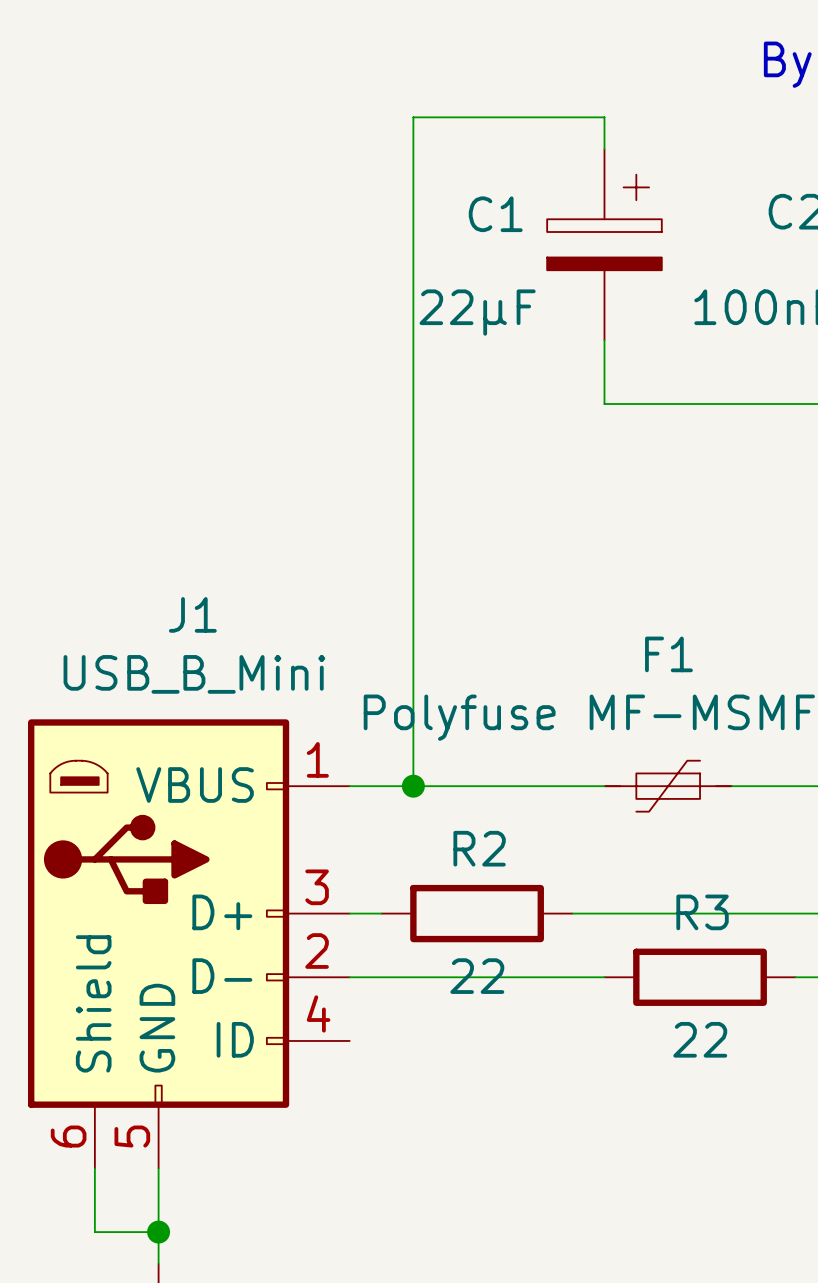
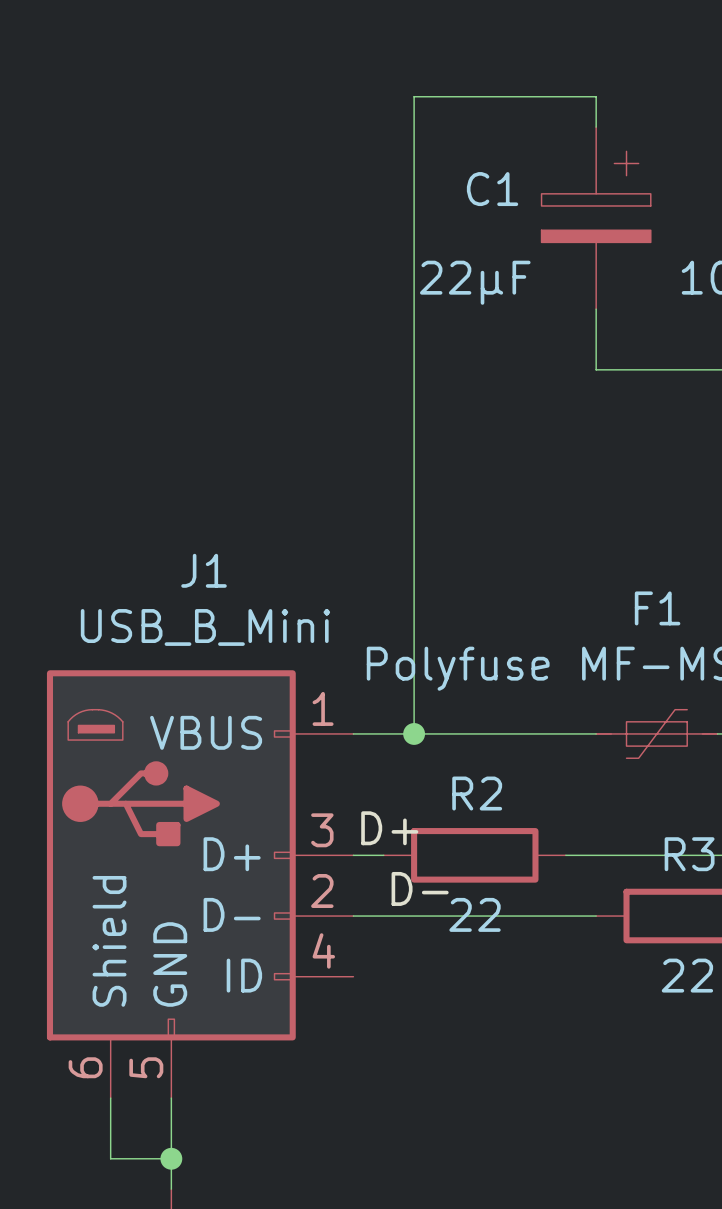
label: none -> D+ (389, 828)
label: none -> D- (420, 888)

